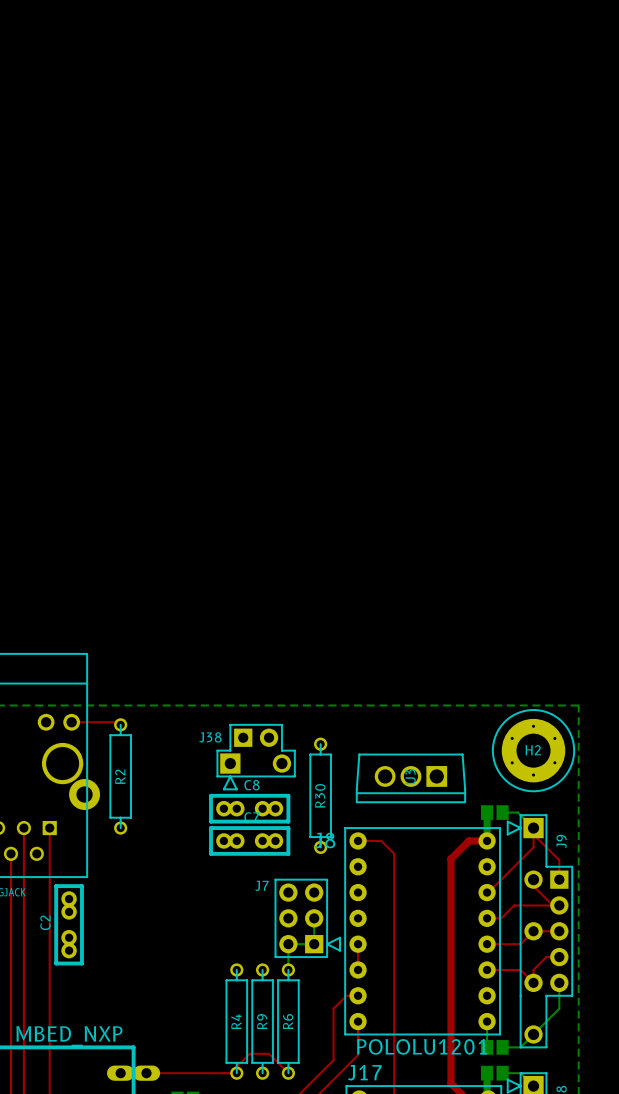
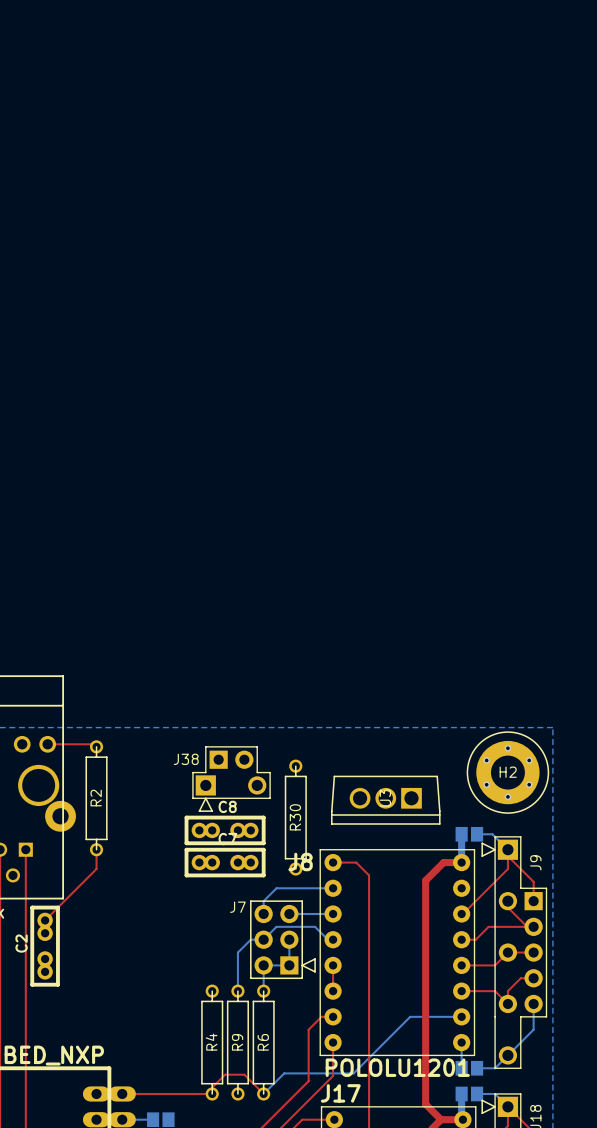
top track: none -> (96, 849) (96, 869) (45, 920)
bottom track: none -> (333, 888) (276, 888) (263, 901) (263, 914)
bottom track: none -> (289, 914) (333, 914)
bottom track: none -> (333, 939) (327, 939) (315, 926) (276, 926) (263, 939) (250, 939) (237, 952) (237, 991)
bottom track: none -> (461, 1016) (410, 1016) (353, 1073) (284, 1073) (263, 1093)

